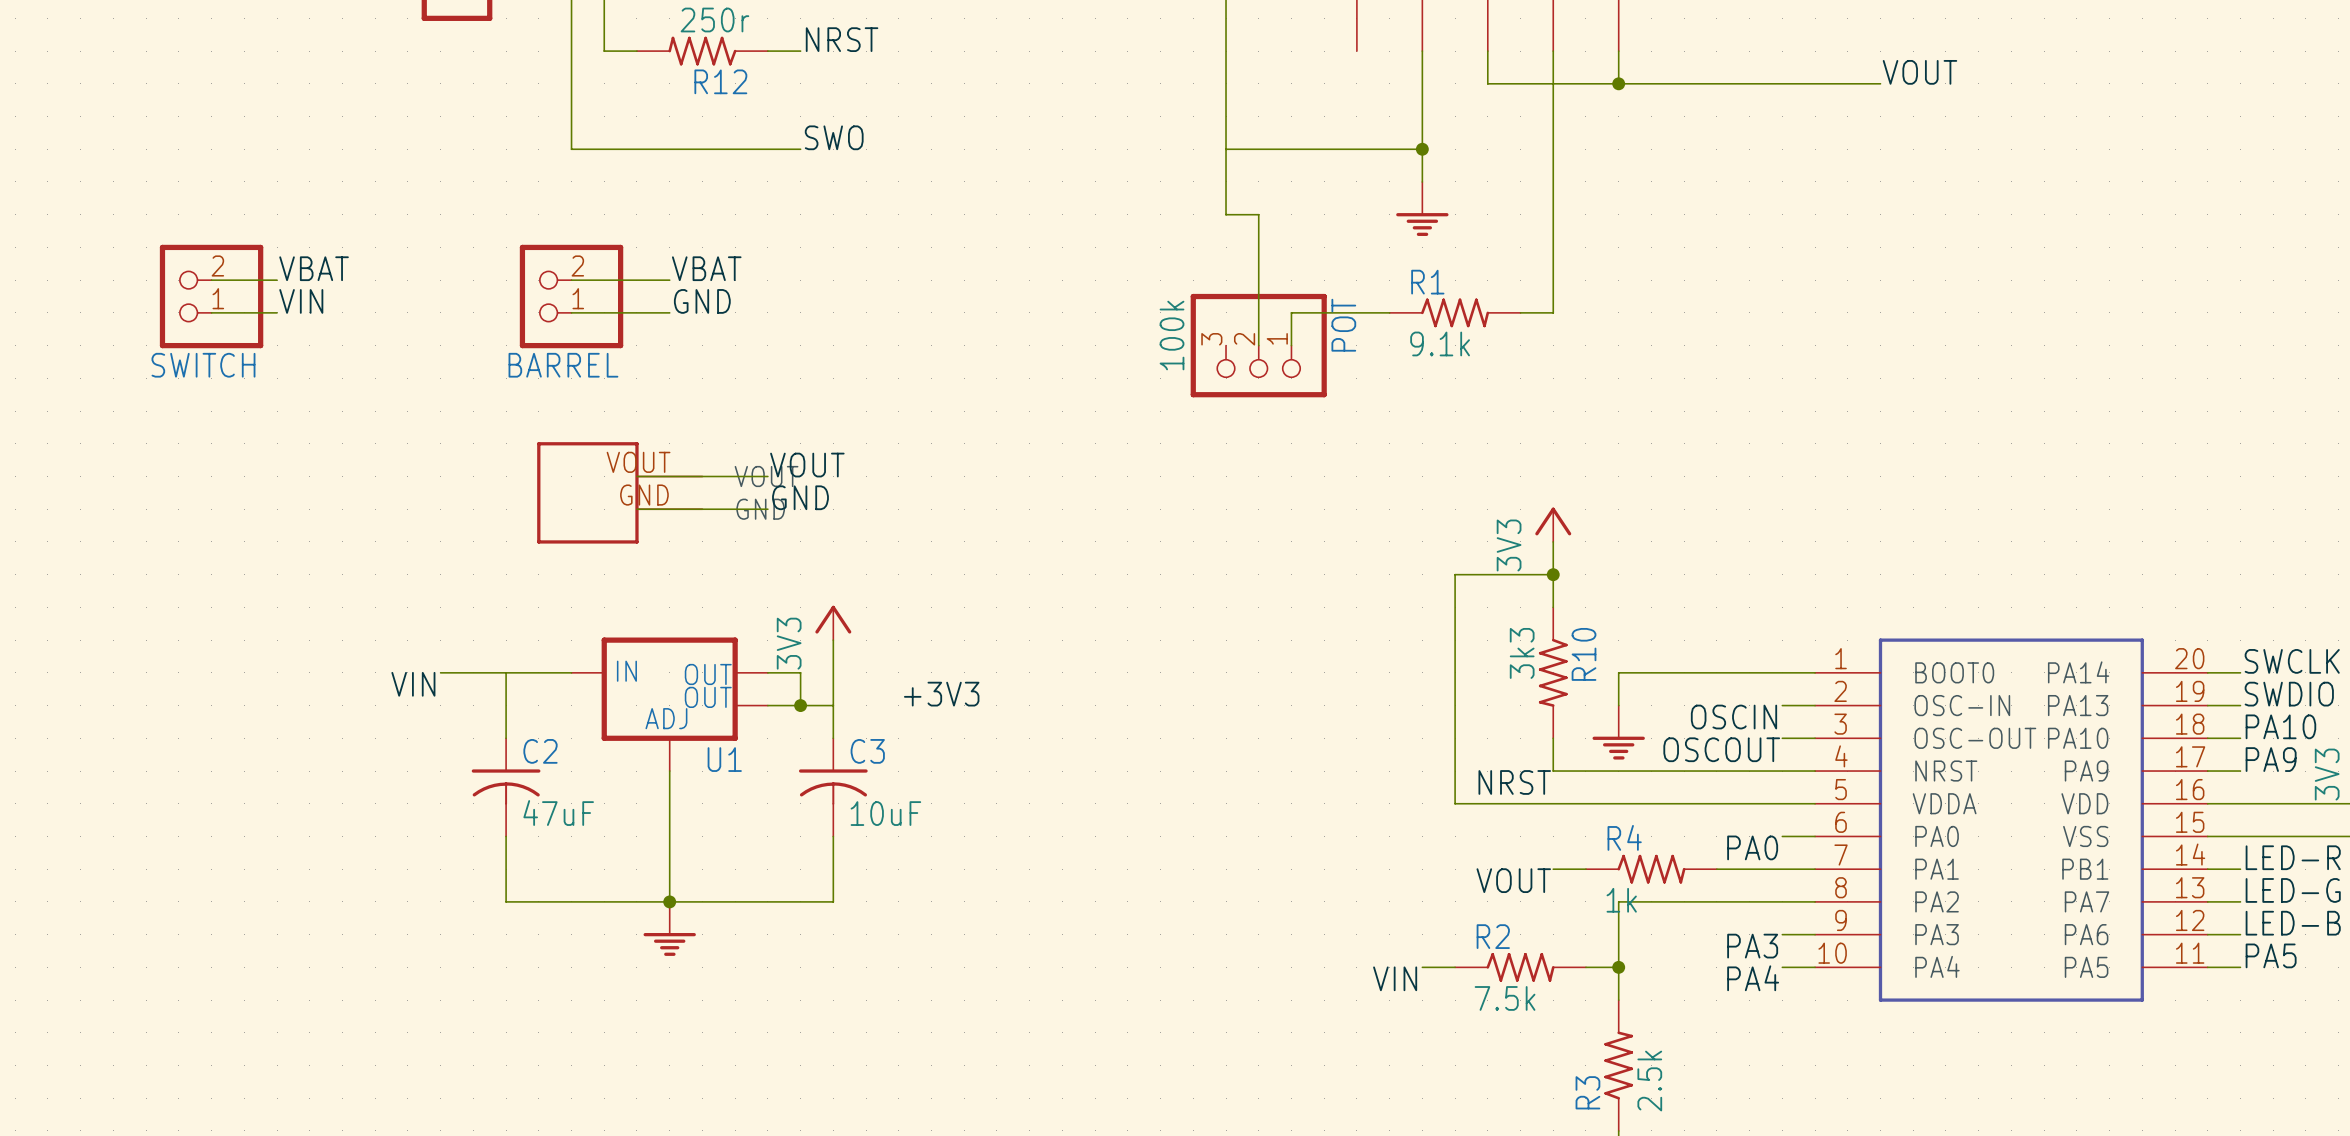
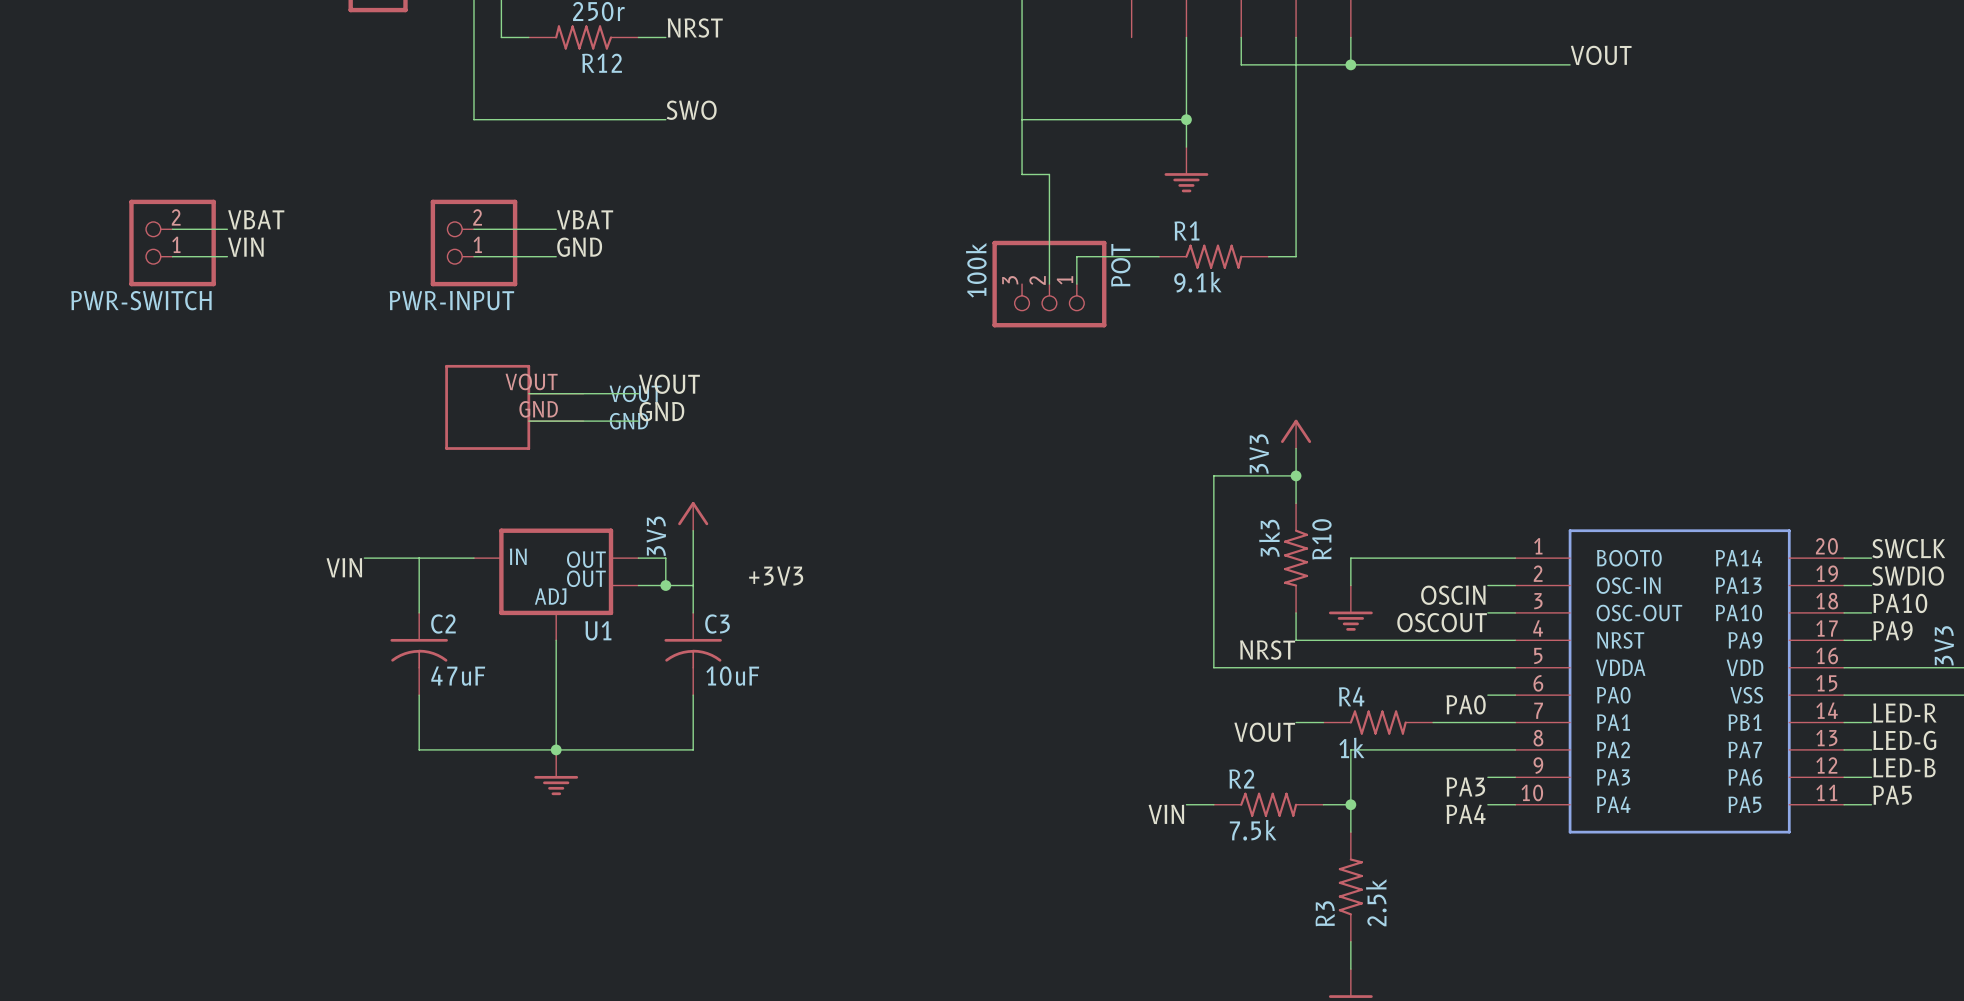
SWITCH name: SWITCH (203, 365) -> PWR-SWITCH (141, 300)
BARREL name: BARREL (563, 365) -> PWR-INPUT (451, 300)

